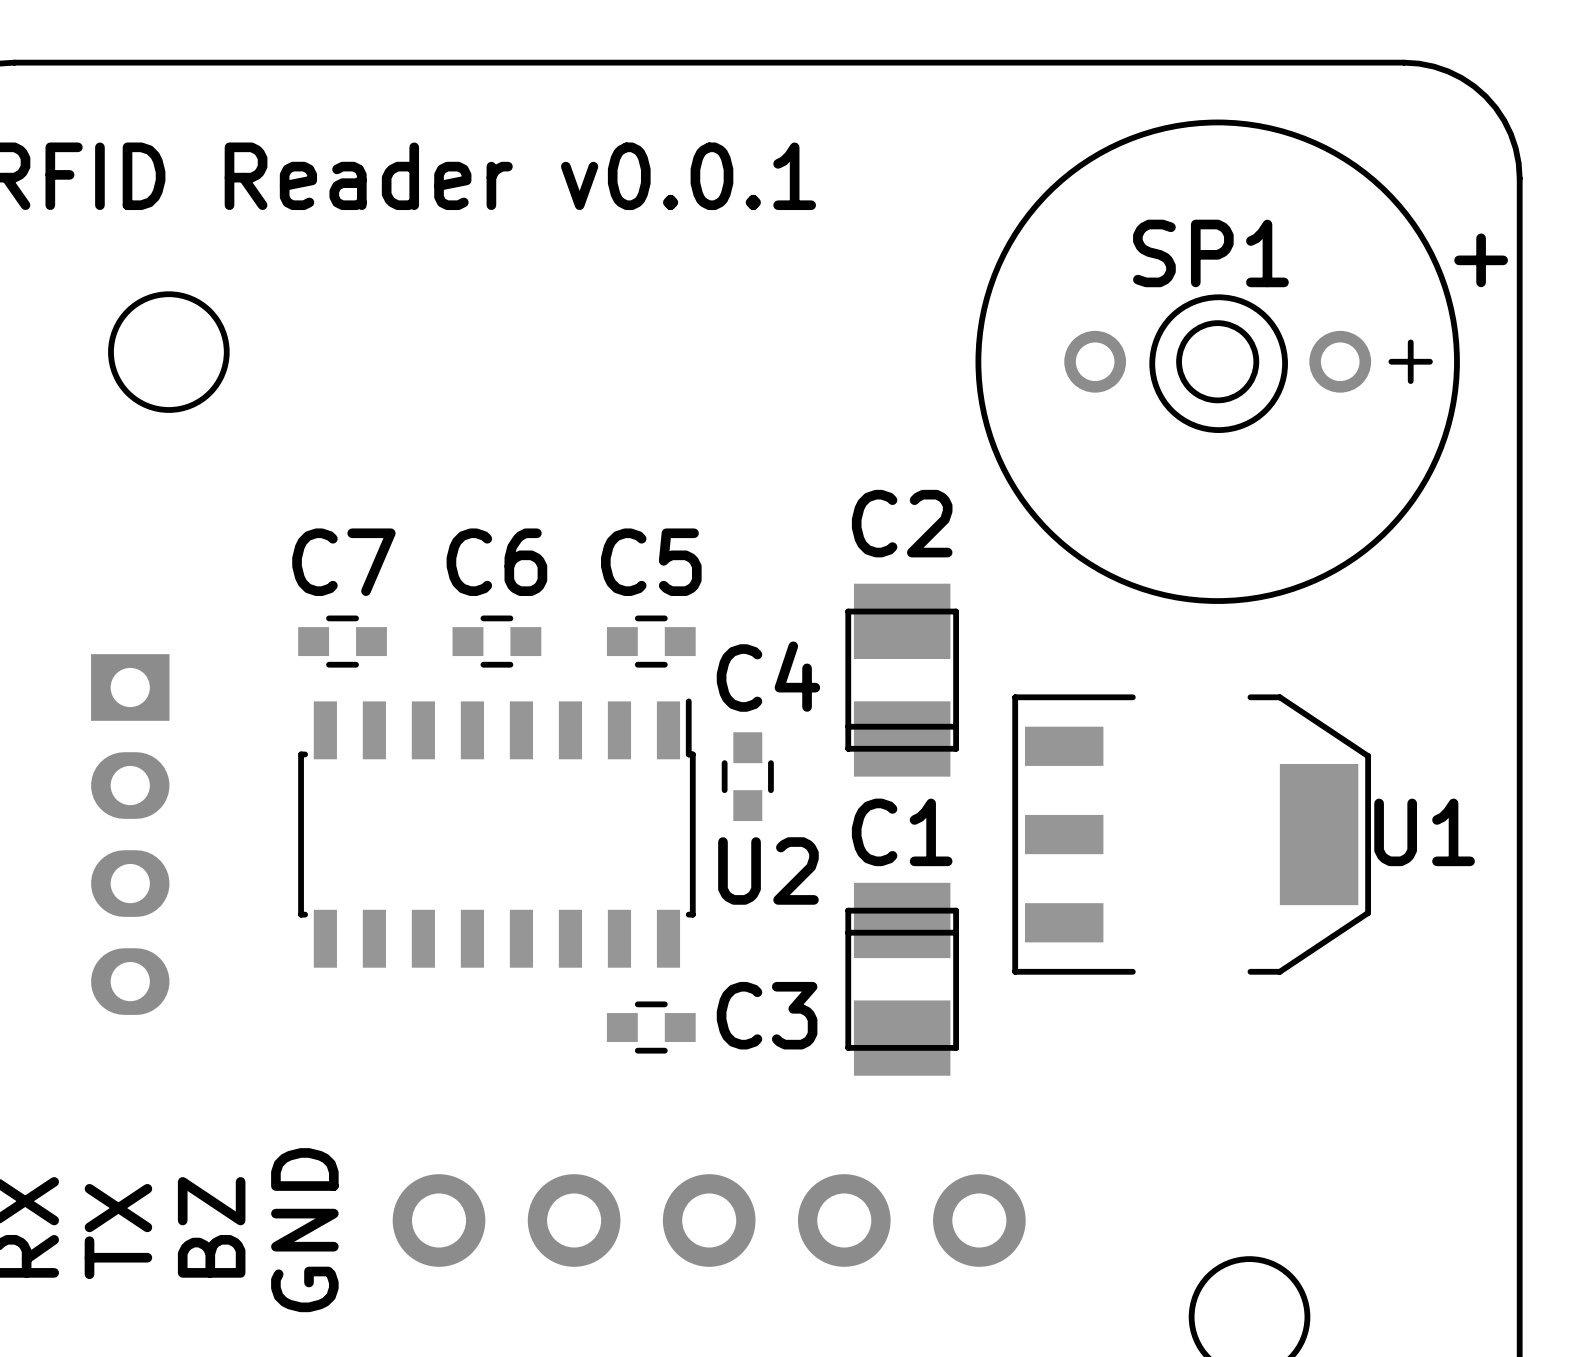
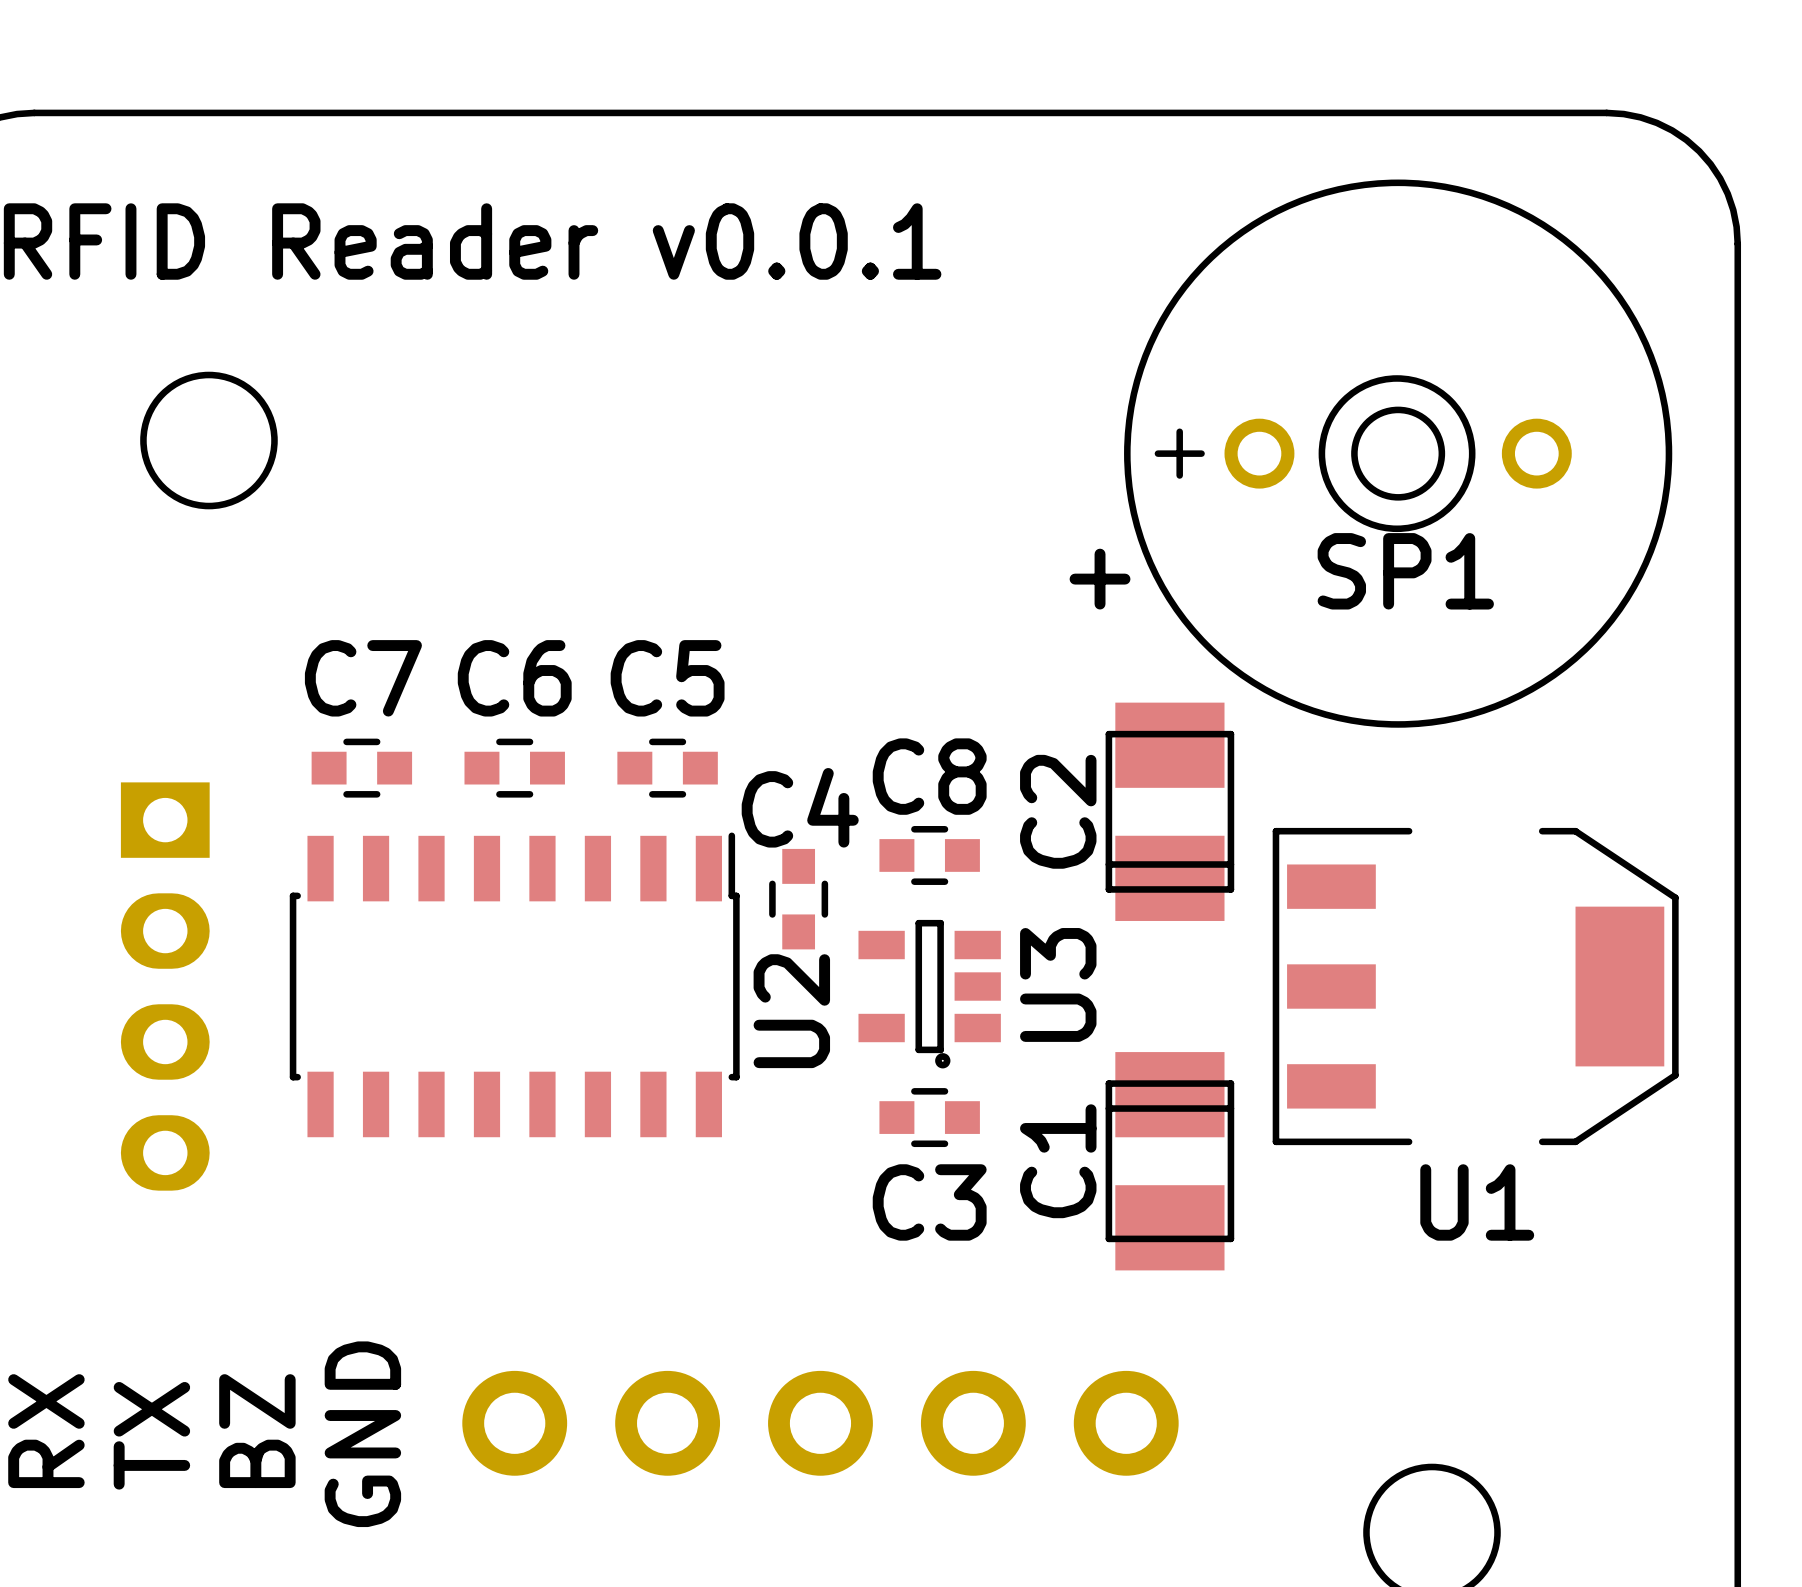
SP1 rotation: 0° (1217, 361) -> 180° (1398, 453)
C2 name rotation: 0° (902, 523) -> 90° counterclockwise (1058, 811)
C2 name position: C2 (902, 523) -> C2 (1058, 811)
C7 position: (342, 641) -> (361, 768)
C6 position: (496, 641) -> (514, 768)
C5 position: (651, 641) -> (667, 768)
C4 name position: C4 (768, 676) -> C4 (800, 807)
C2 position: (902, 680) -> (1169, 811)
C8: none -> (929, 855)
C4 position: (747, 776) -> (798, 899)
C1 name rotation: 0° (902, 832) -> 90° counterclockwise (1058, 1161)
C1 name position: C1 (902, 832) -> C1 (1058, 1161)
U1 name position: U1 (1424, 832) -> U1 (1477, 1202)
U2 position: (496, 833) -> (514, 984)
U1 position: (1191, 834) -> (1475, 986)
U3: none -> (929, 994)
U2 name rotation: 0° (768, 870) -> 90° counterclockwise (791, 1011)
C1 position: (902, 979) -> (1169, 1161)
C3 name position: C3 (767, 1015) -> C3 (929, 1202)
C3 position: (651, 1027) -> (929, 1117)

